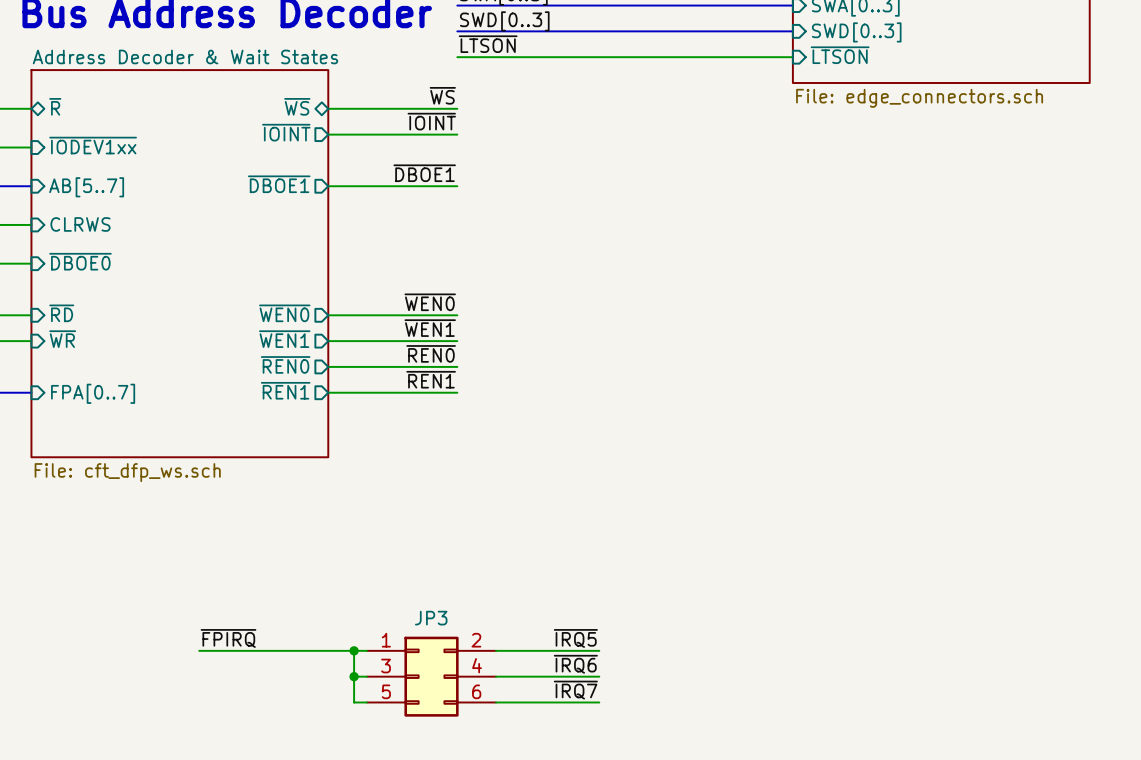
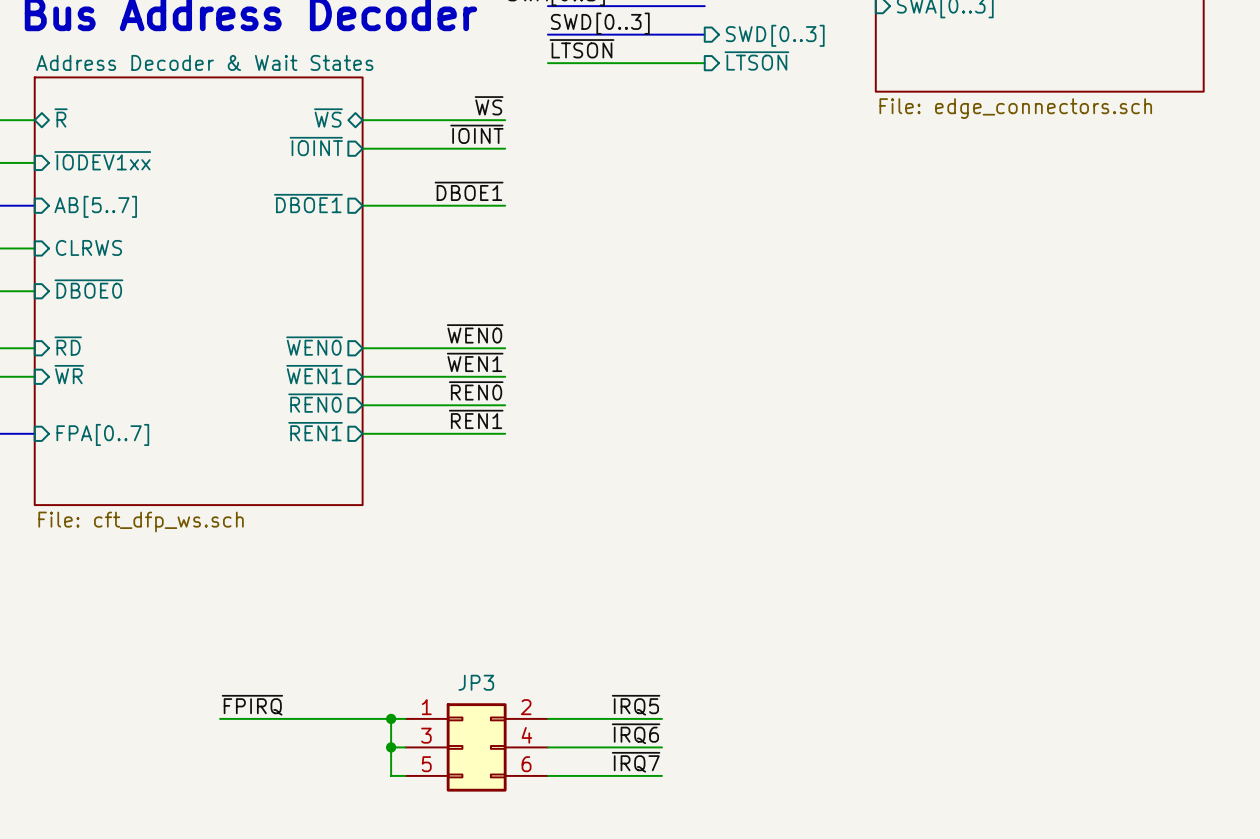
bus: (457, 5) (496, 5) -> none
bus: (638, 5) (792, 5) -> none
label position: SWD[0..3] (504, 21) -> SWD[0..3] (600, 23)
bus: (457, 31) (496, 31) -> none
bus: (638, 31) (792, 31) -> none
sheet pin position: SWD[0..3] (856, 32) -> SWD[0..3] (775, 35)
label position: ~{LTSON} (488, 44) -> ~{LTSON} (581, 48)
sheet pin position: ~{LTSON} (840, 55) -> ~{LTSON} (756, 60)
wire: (457, 57) (496, 57) -> none
wire: (638, 57) (792, 57) -> none

